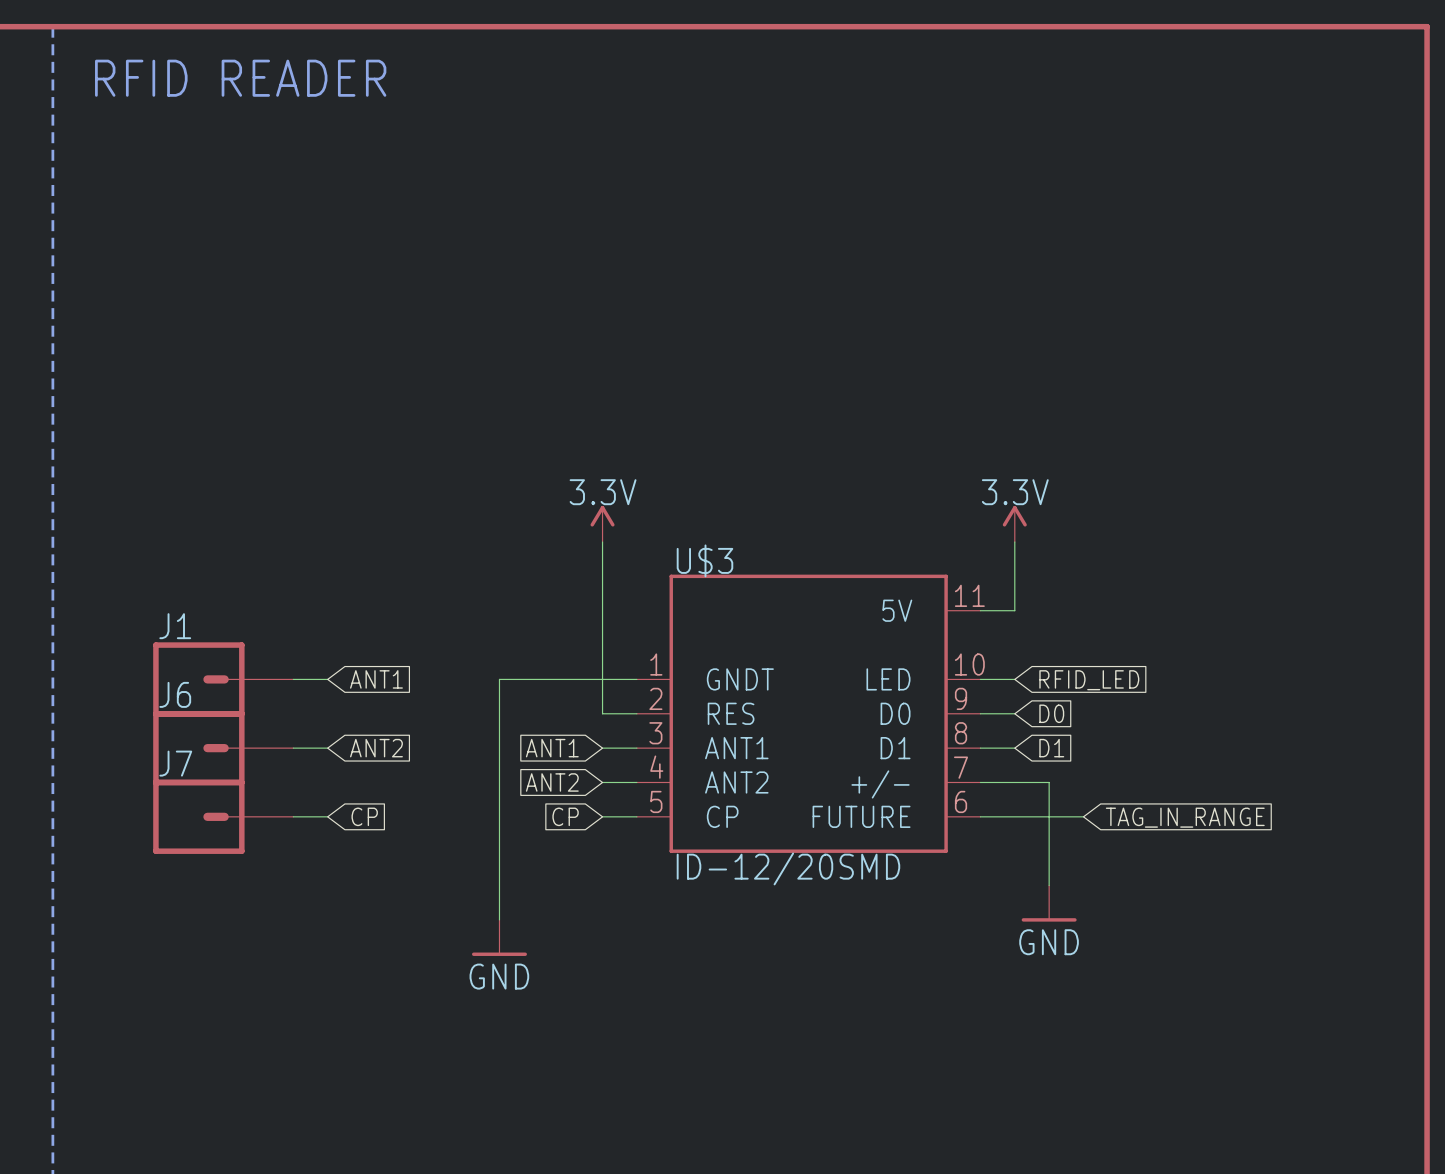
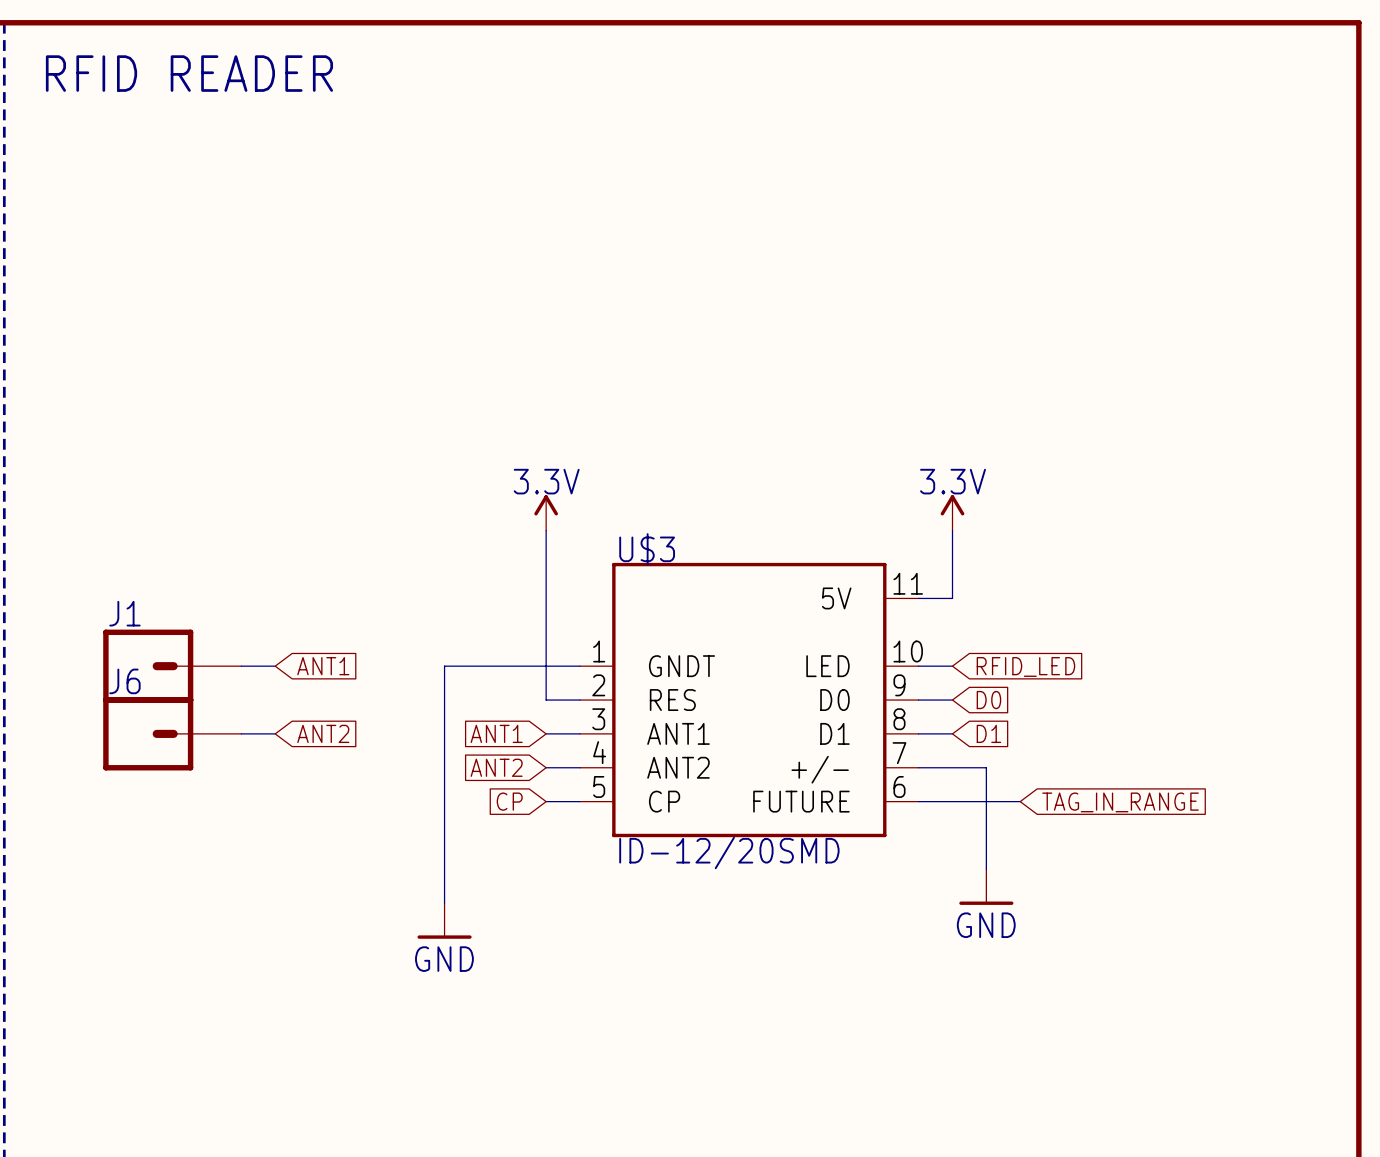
J7: (223, 816) -> none
wire: (293, 816) (327, 816) -> none
global label: CP (364, 816) -> none

